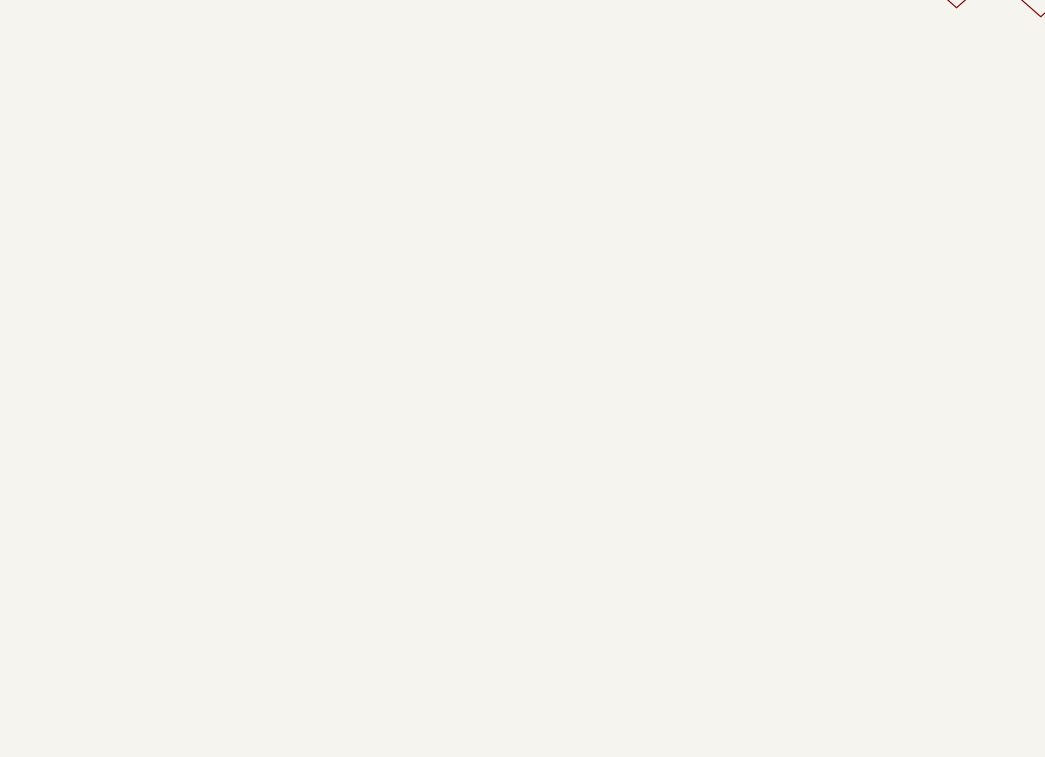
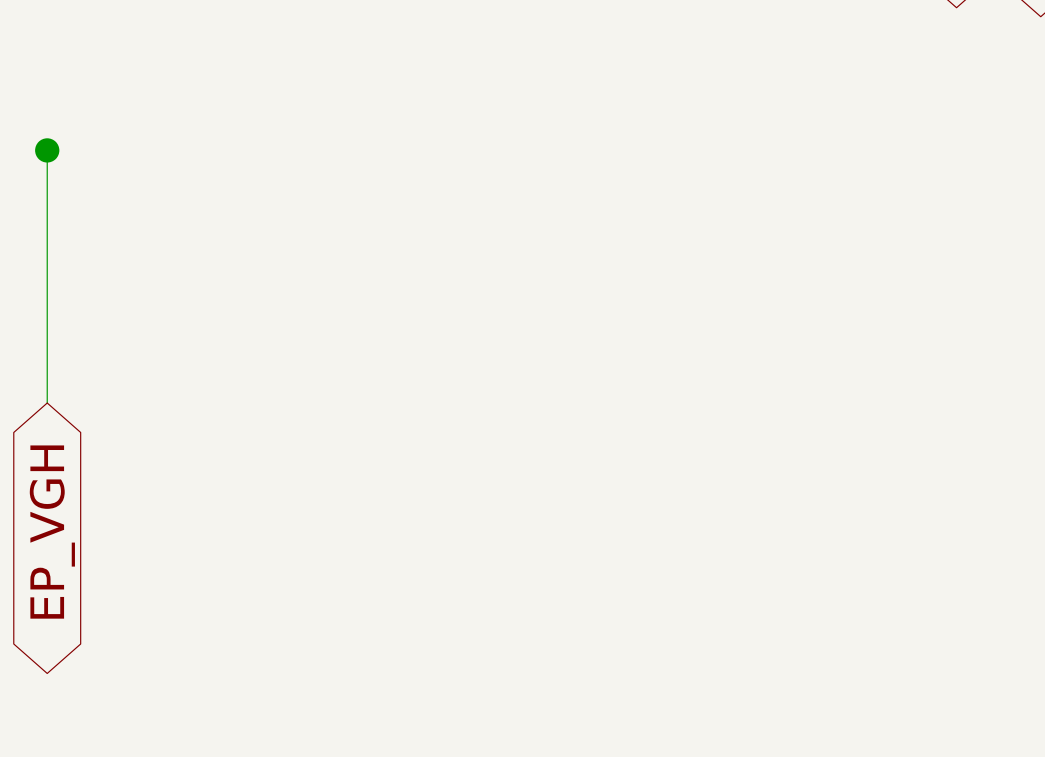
wire: none -> (47, 150) (47, 403)
junction: none -> (47, 150)
global label: none -> EP_VGH (52, 532)

